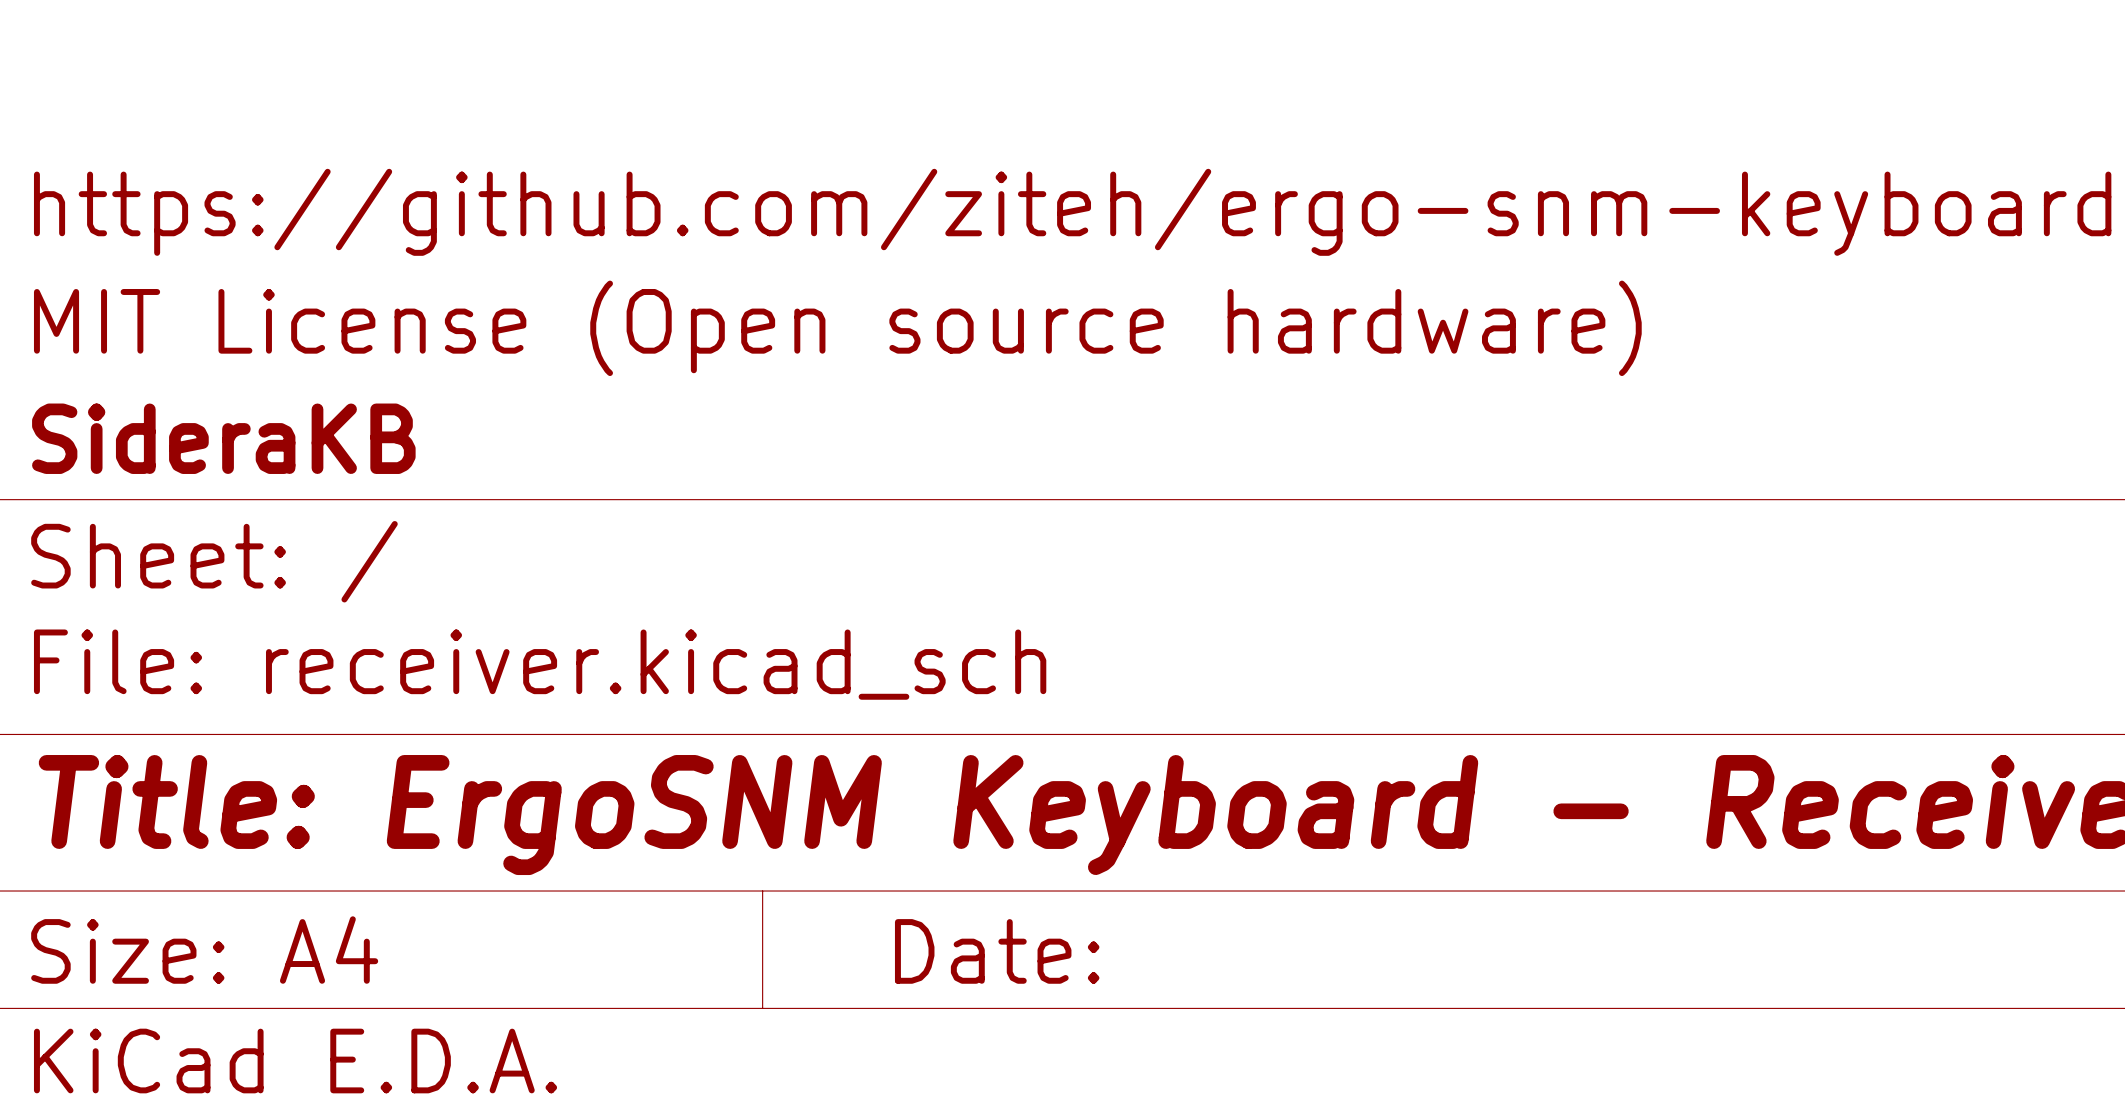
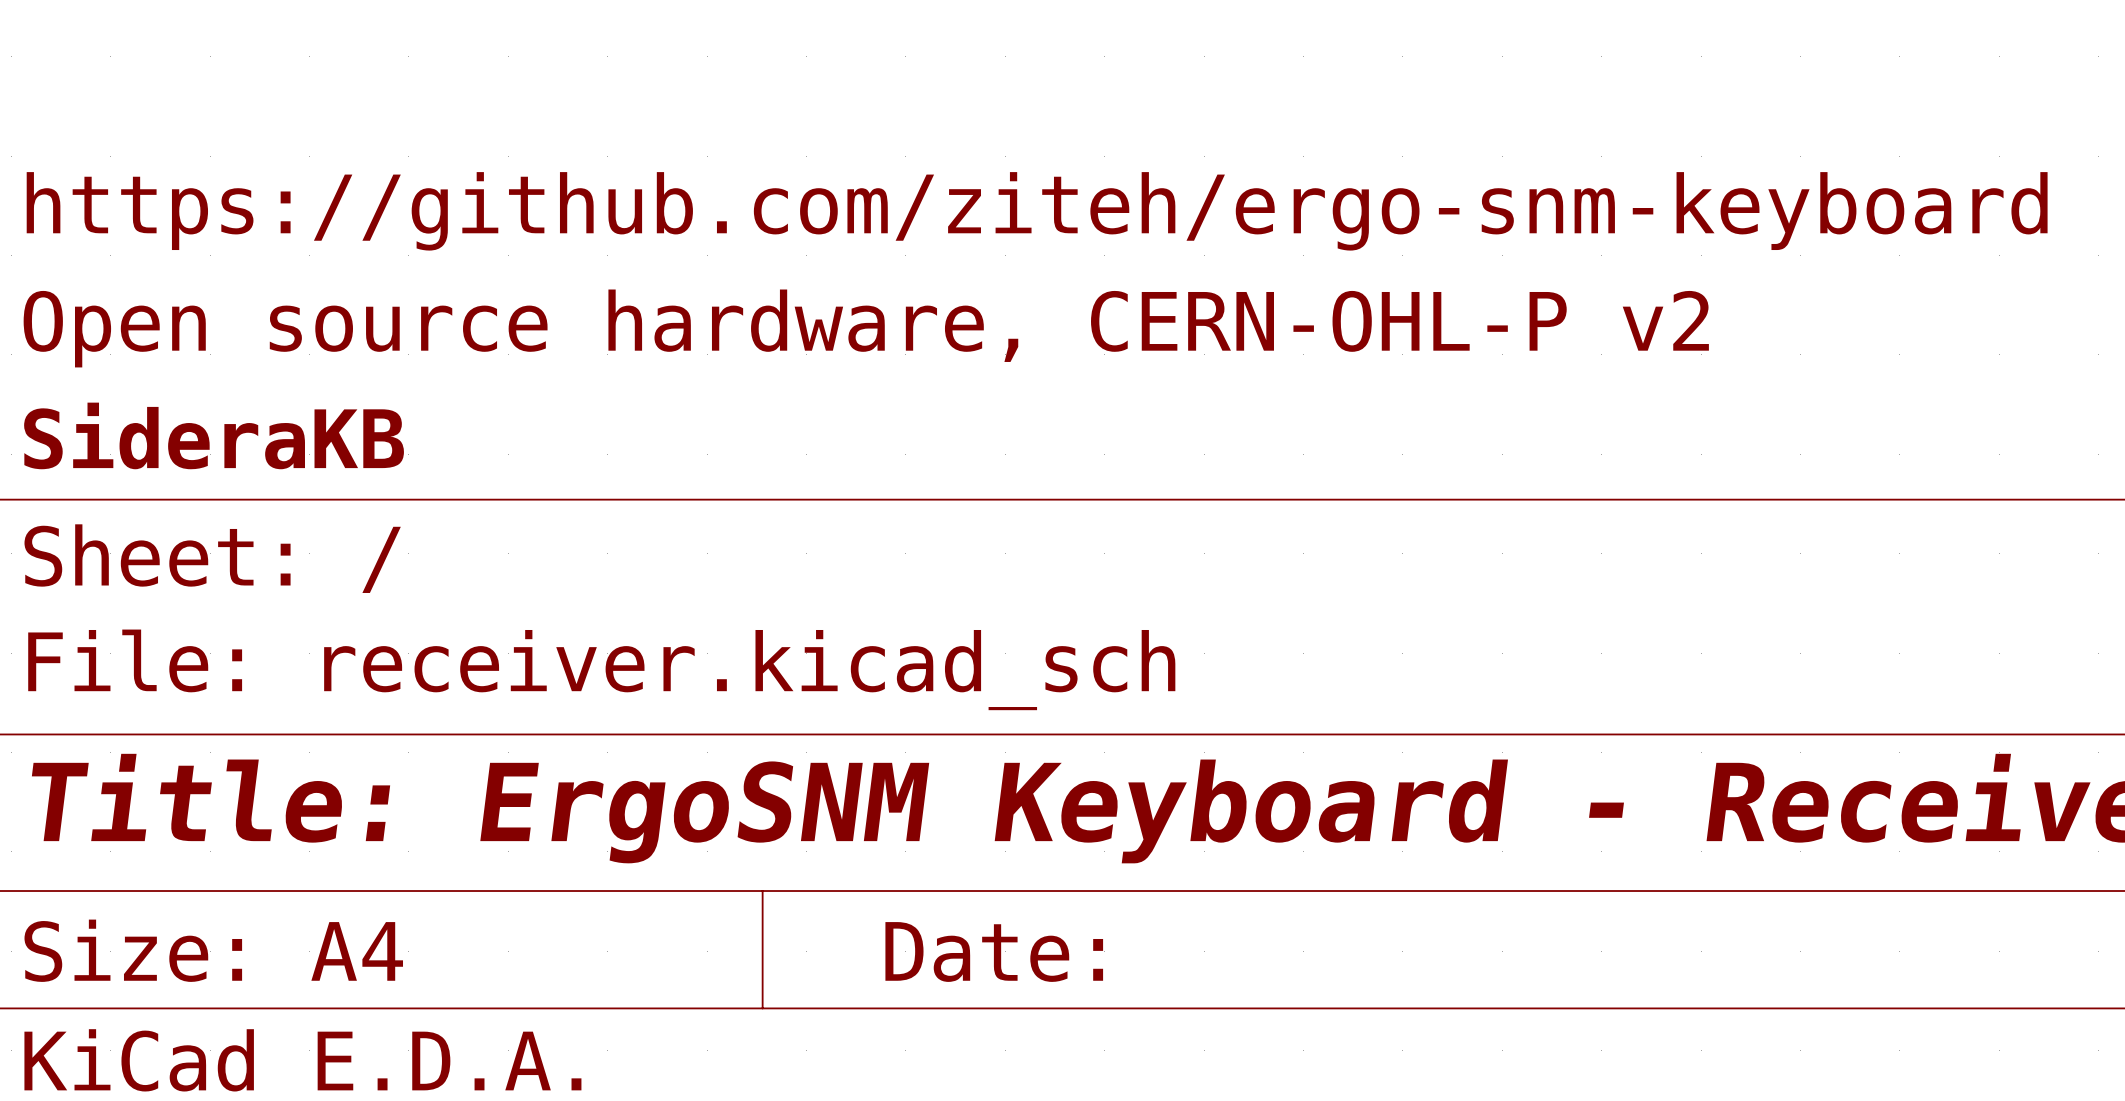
title block: MIT License (Open source hardware) (837, 328) -> Open source hardware, CERN-OHL-P v2 (866, 328)

